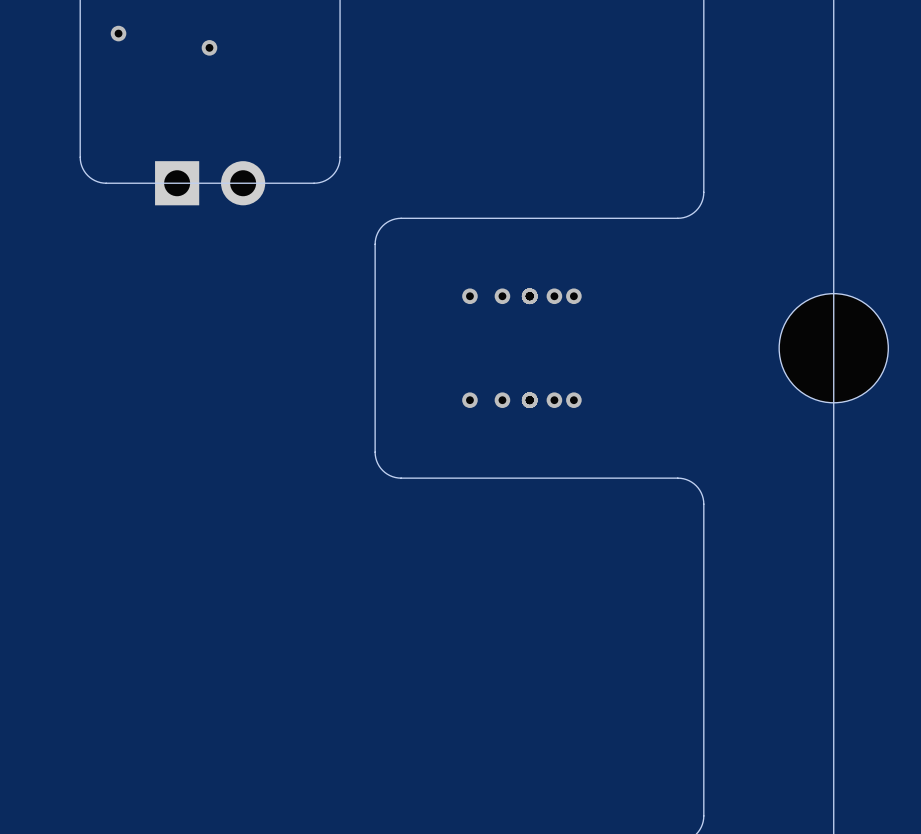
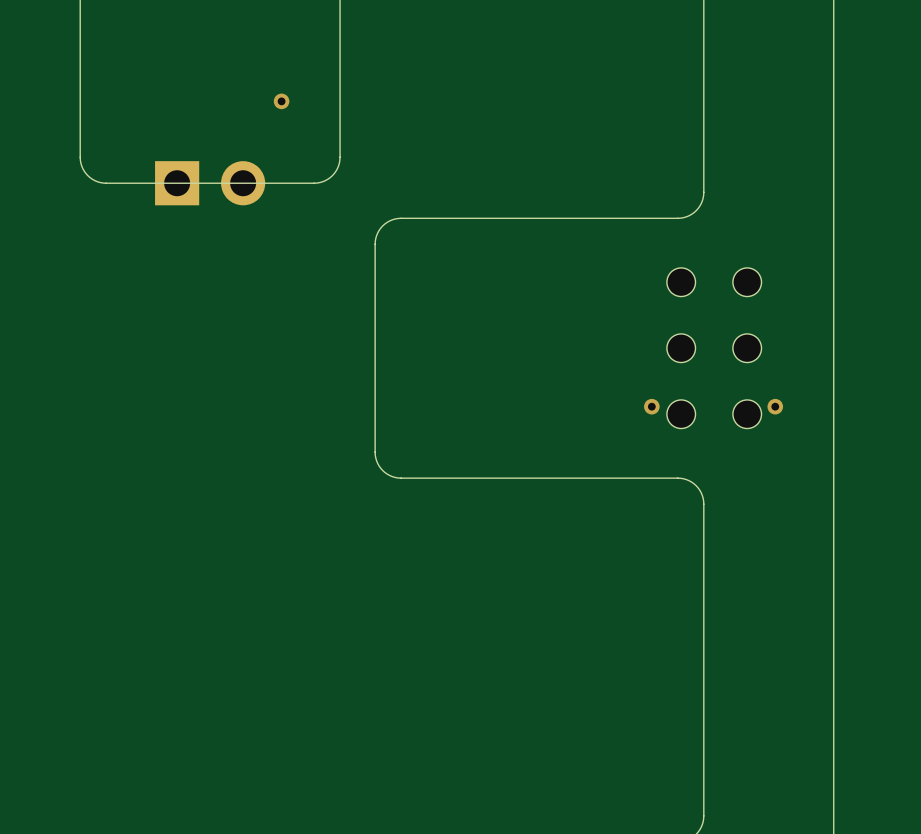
via: (118, 33) -> none
via: (209, 47) -> none
via: none -> (281, 101)
via: (469, 296) -> none
via: (502, 296) -> none
via: (529, 296) -> none
via: (554, 296) -> none
via: (573, 296) -> none
part: none -> (714, 348)
part: (833, 348) -> none
via: (469, 400) -> none
via: (502, 400) -> none
via: (529, 400) -> none
via: (554, 400) -> none
via: (573, 400) -> none
via: none -> (651, 406)
via: none -> (775, 406)

